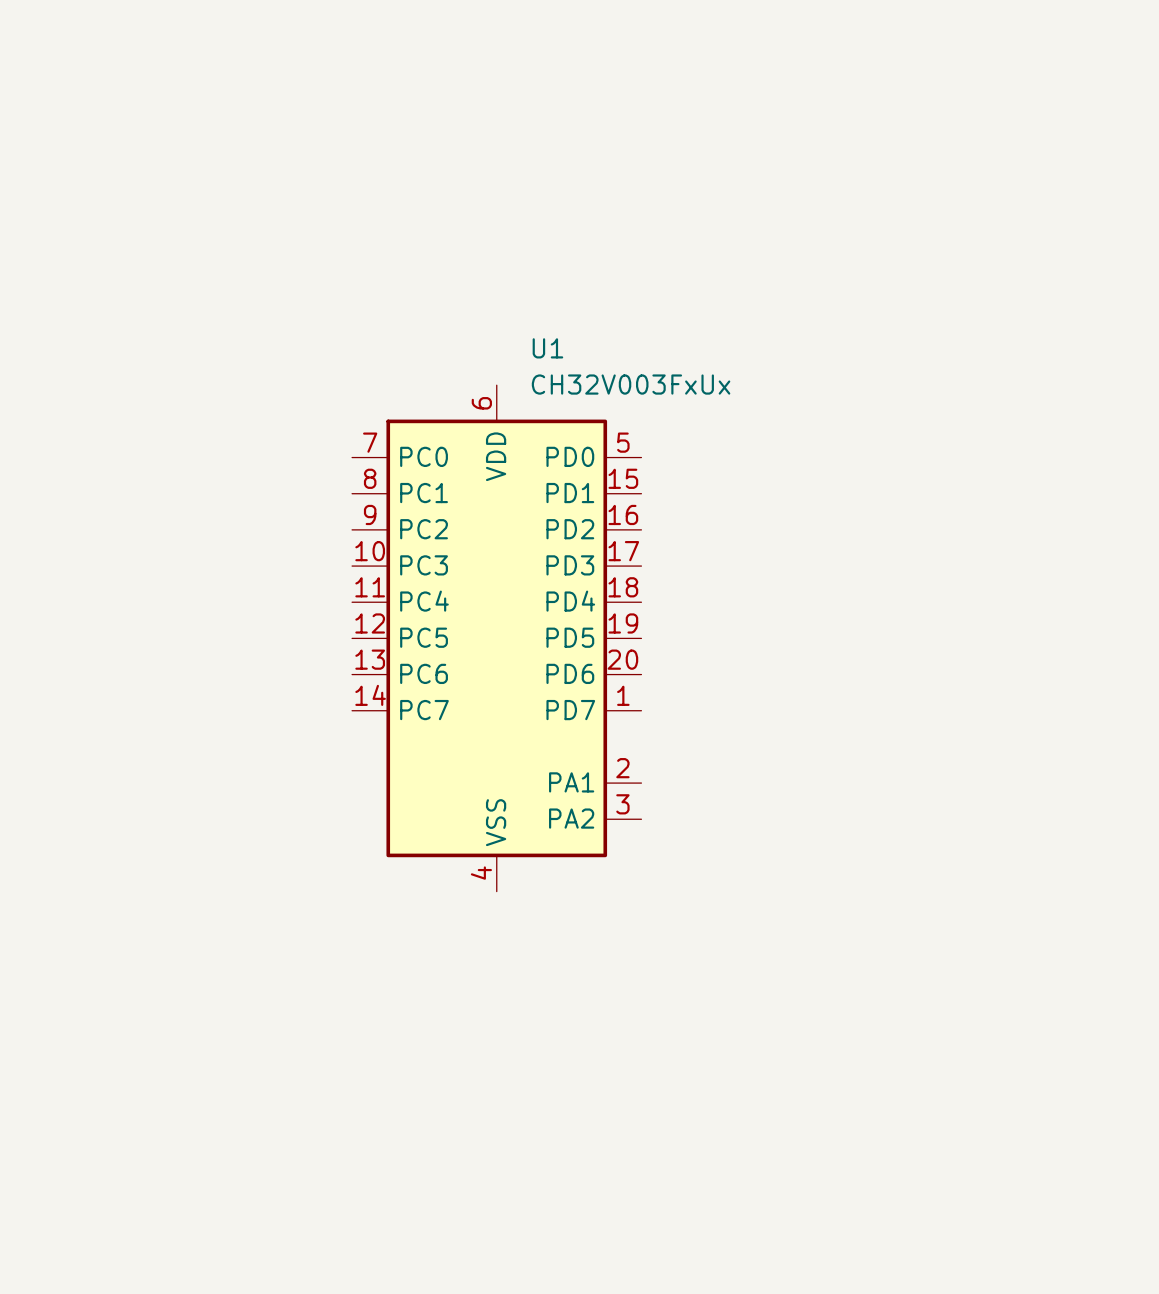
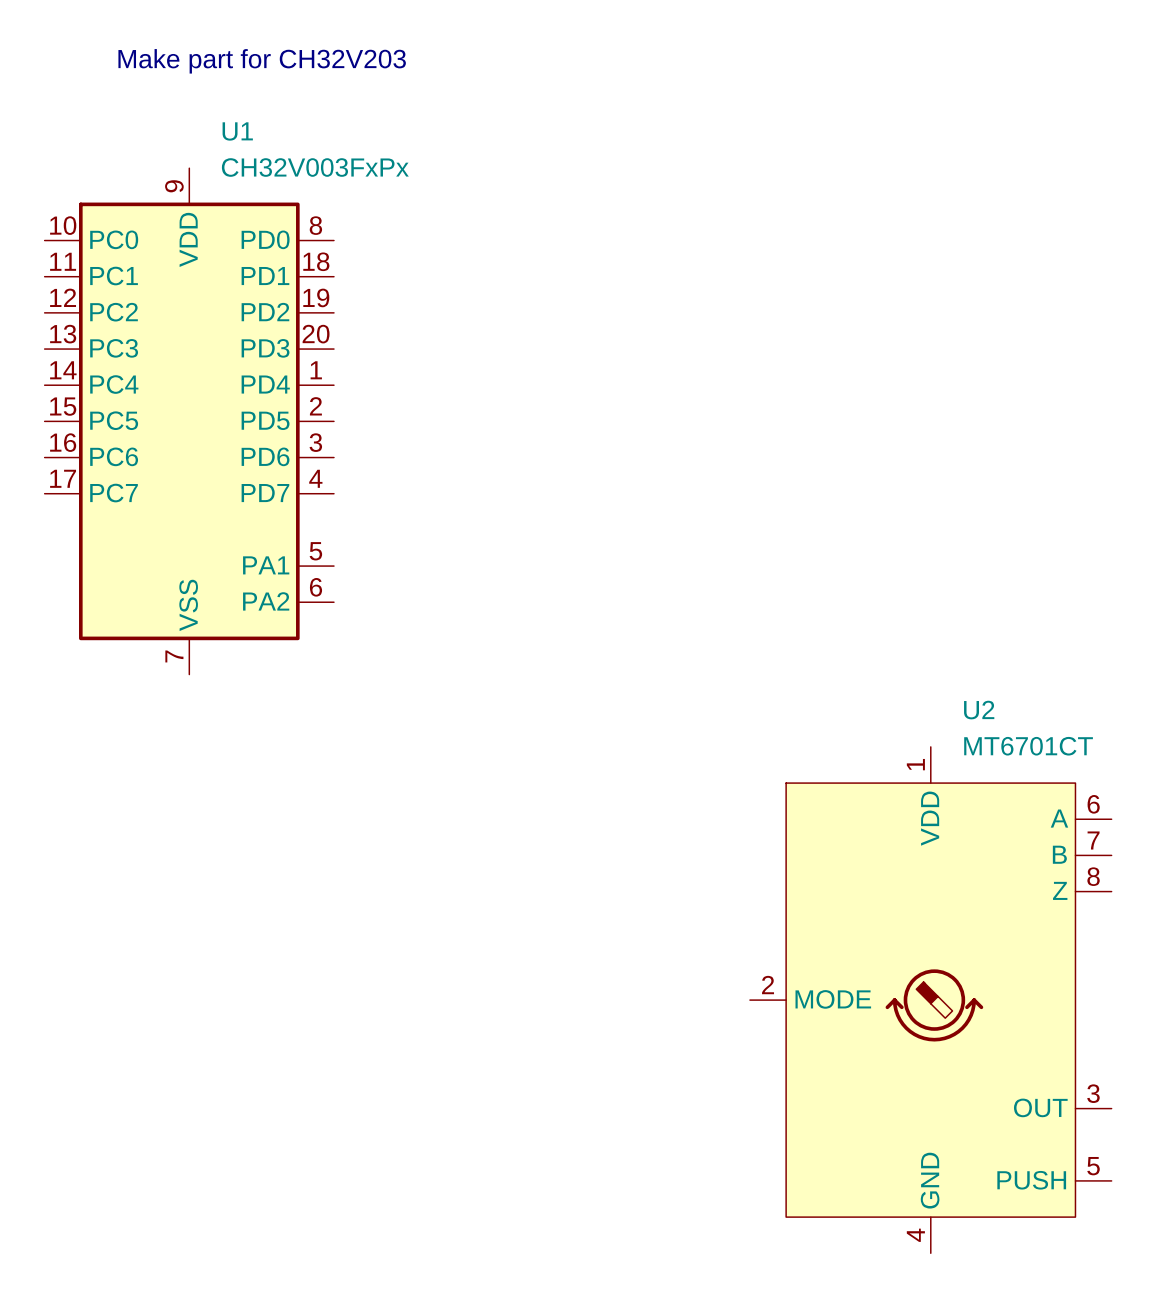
text: none -> Make part for CH32V203 (262, 61)
U1 value: CH32V003FxUx (631, 384) -> CH32V003FxPx (315, 167)
U1 symbol: [352, 385, 642, 892] -> [44, 168, 334, 675]
U2: none -> MT6701CT (930, 1000)

